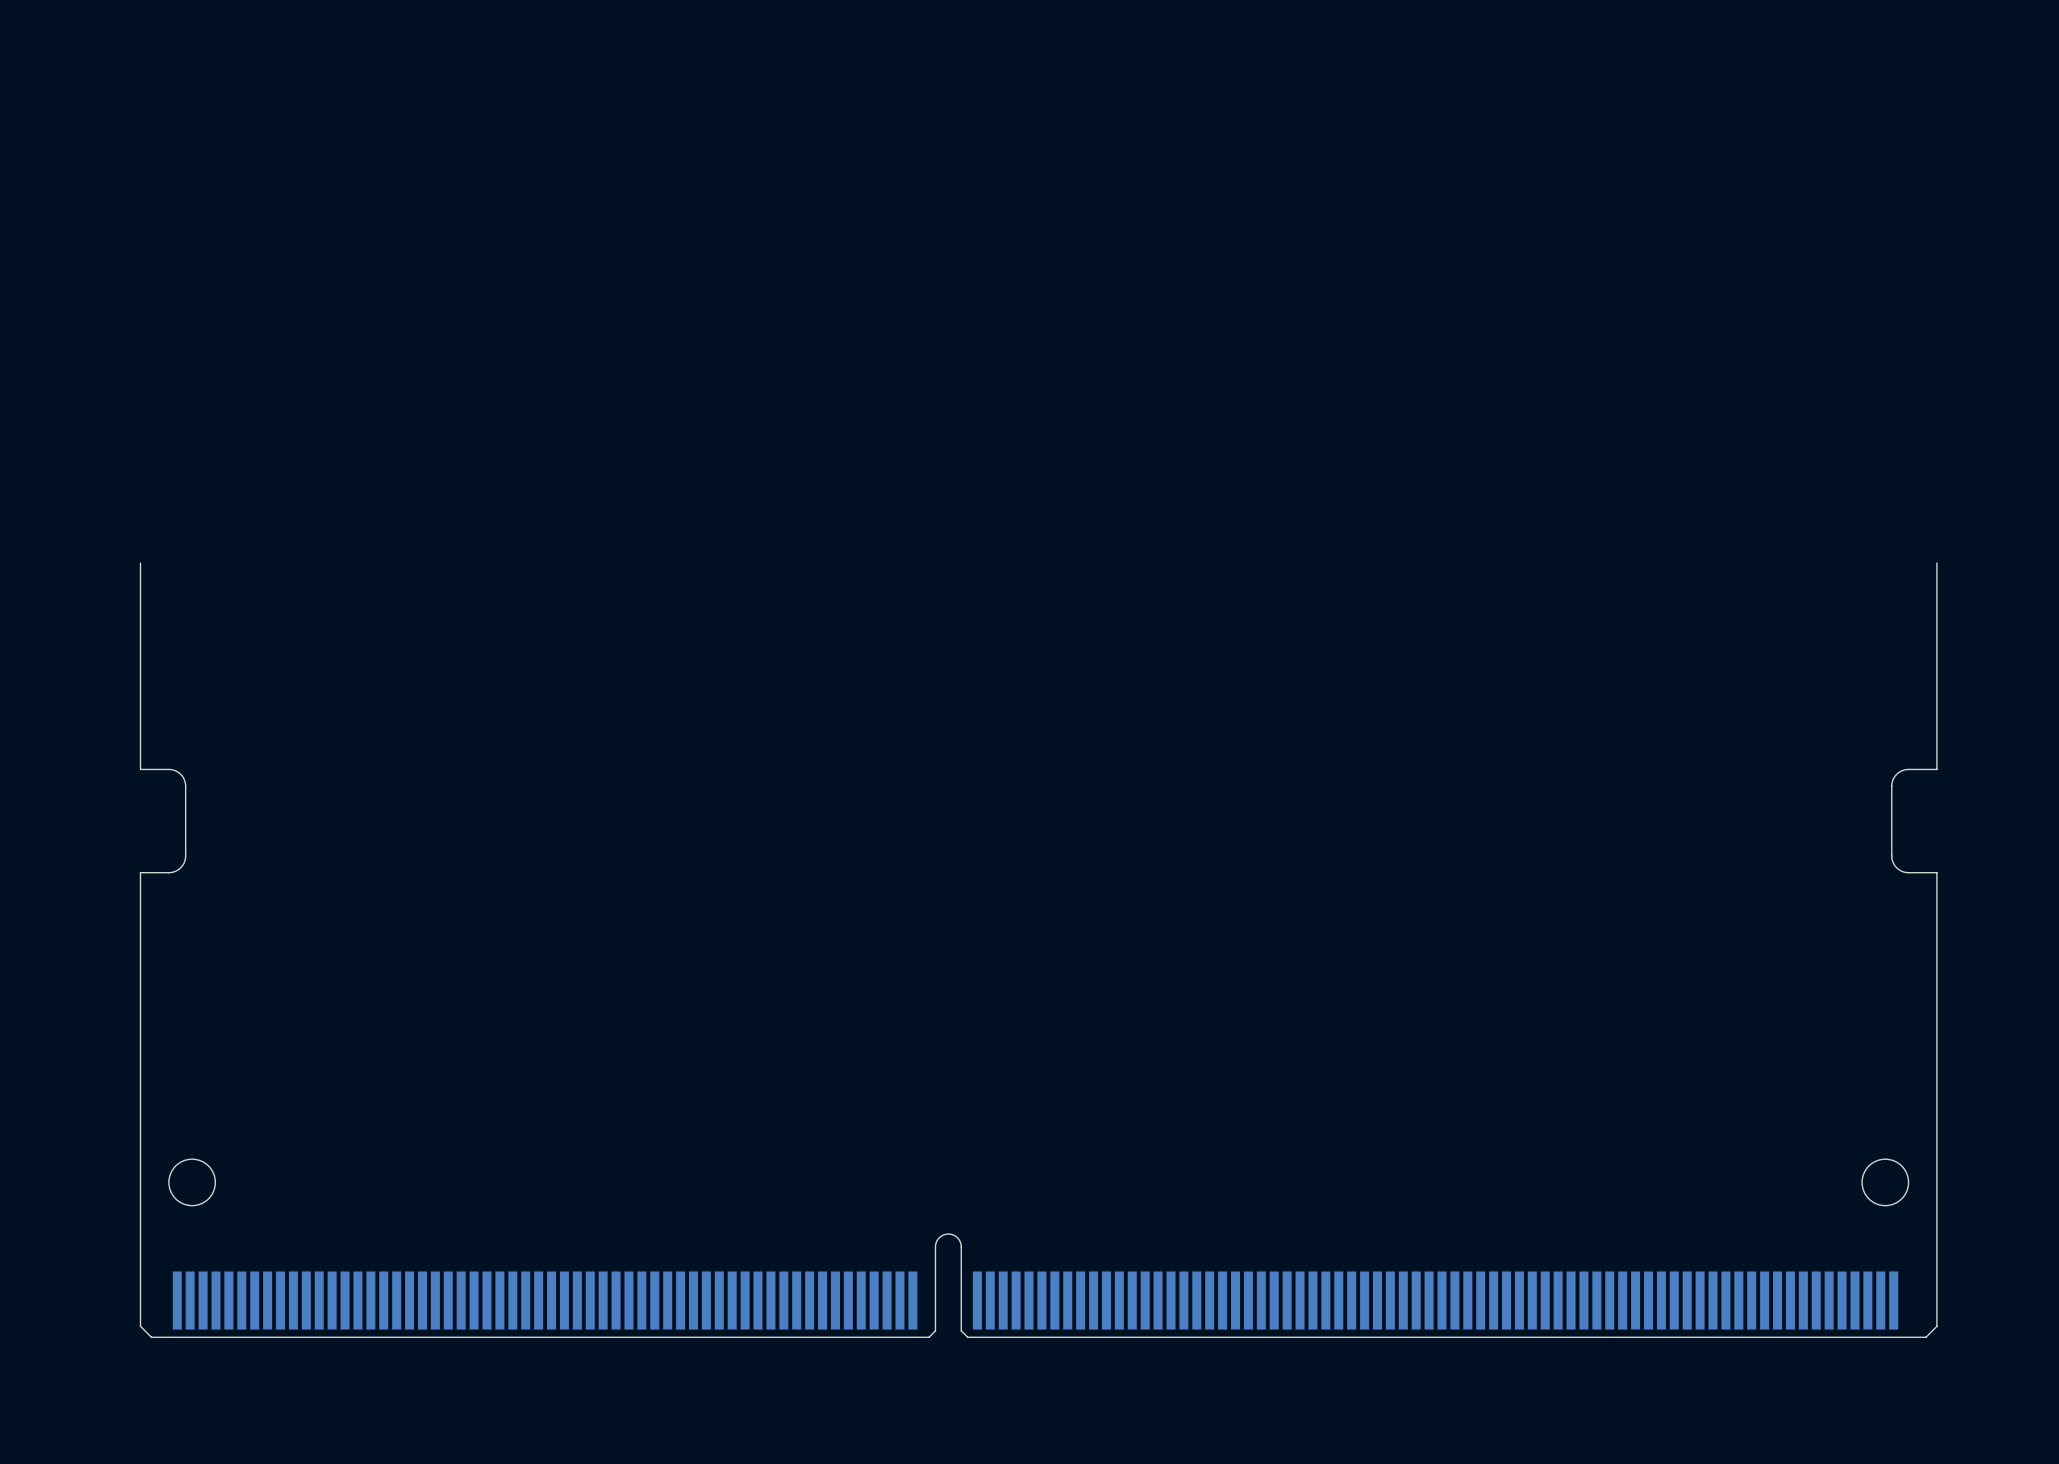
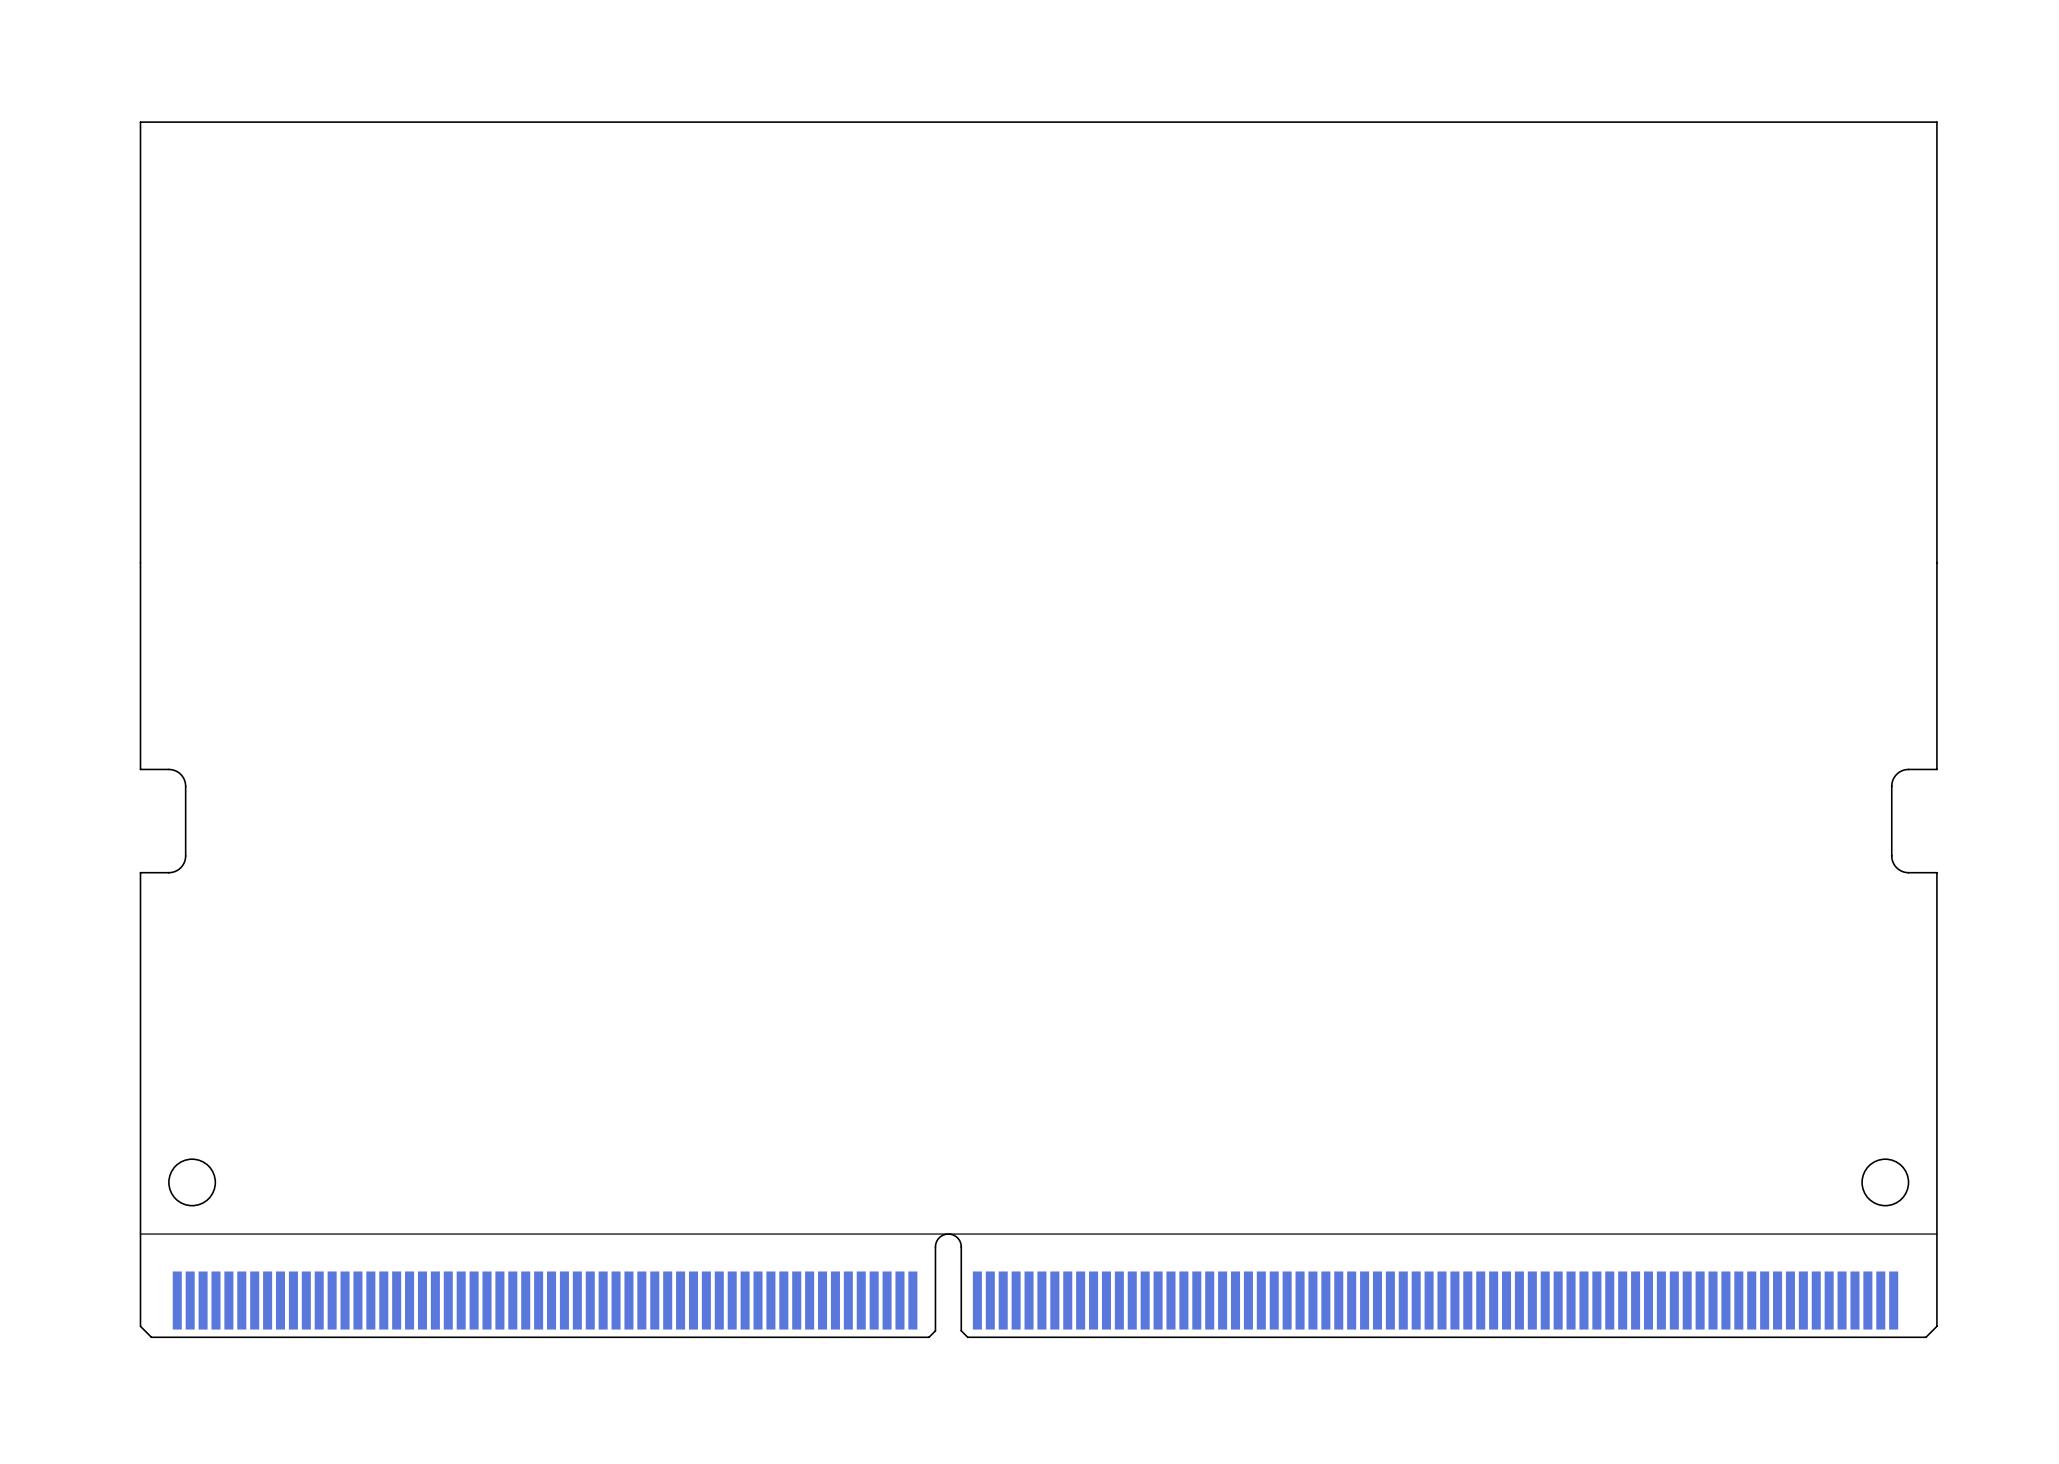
part footprint: [139, 562, 1938, 1338] -> [139, 562, 1938, 1338]
board edge: none -> (1936, 562) (1936, 122) (140, 122) (140, 562)

